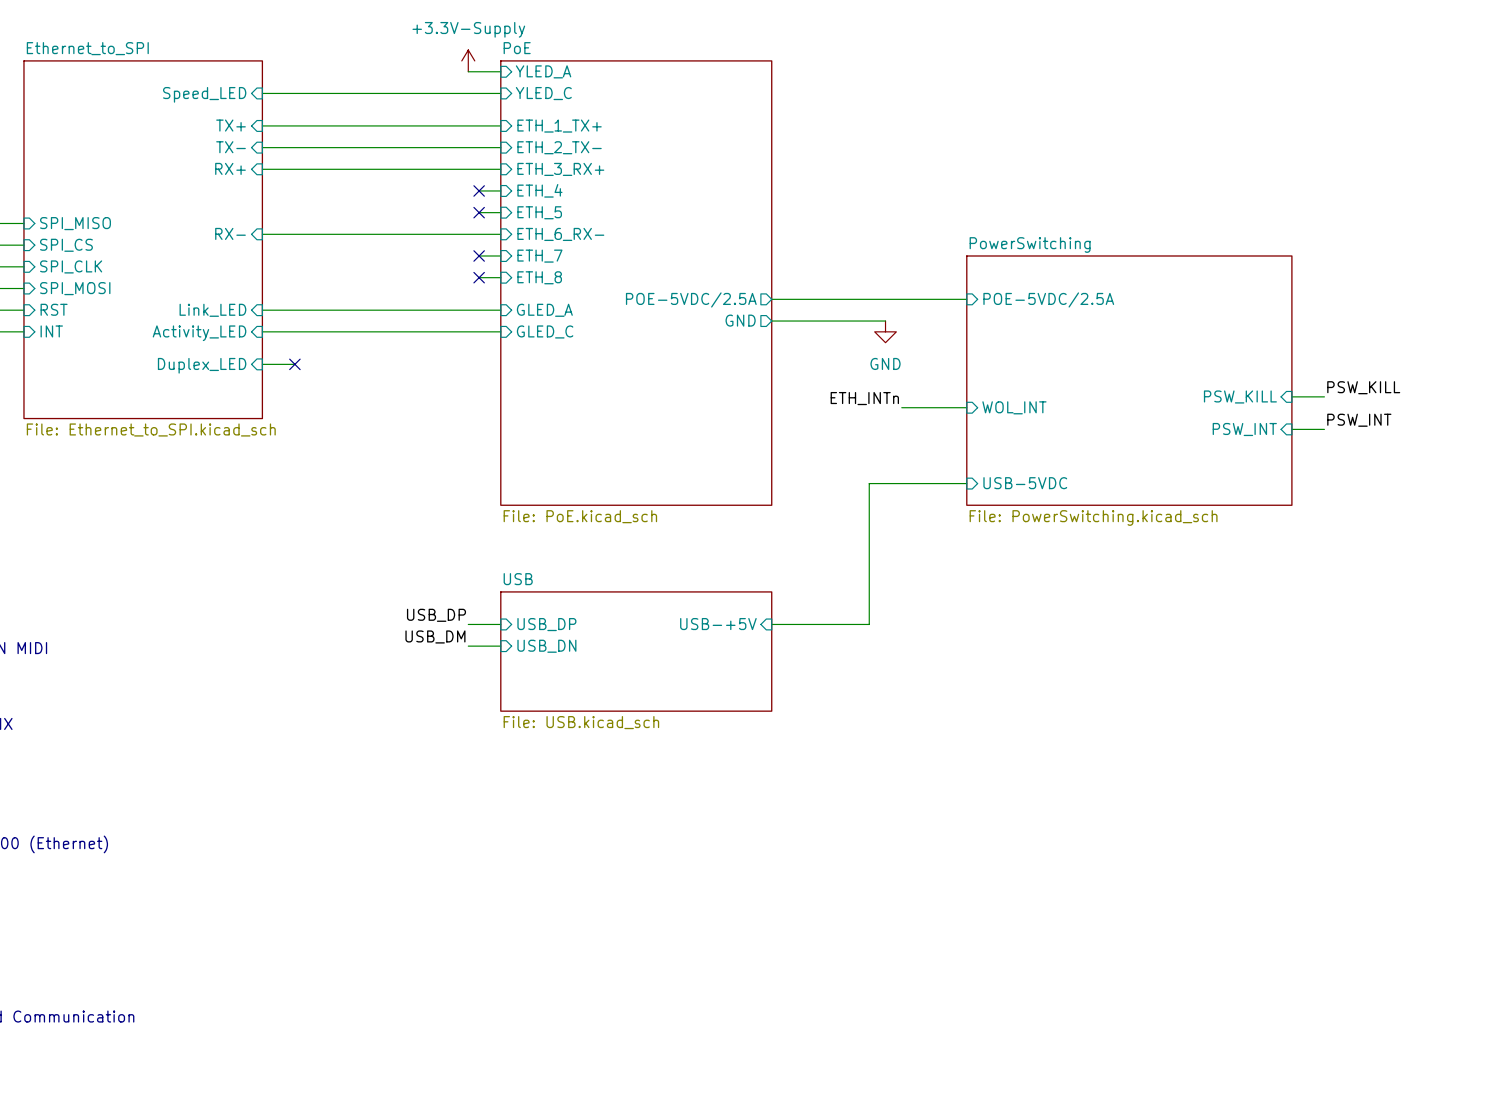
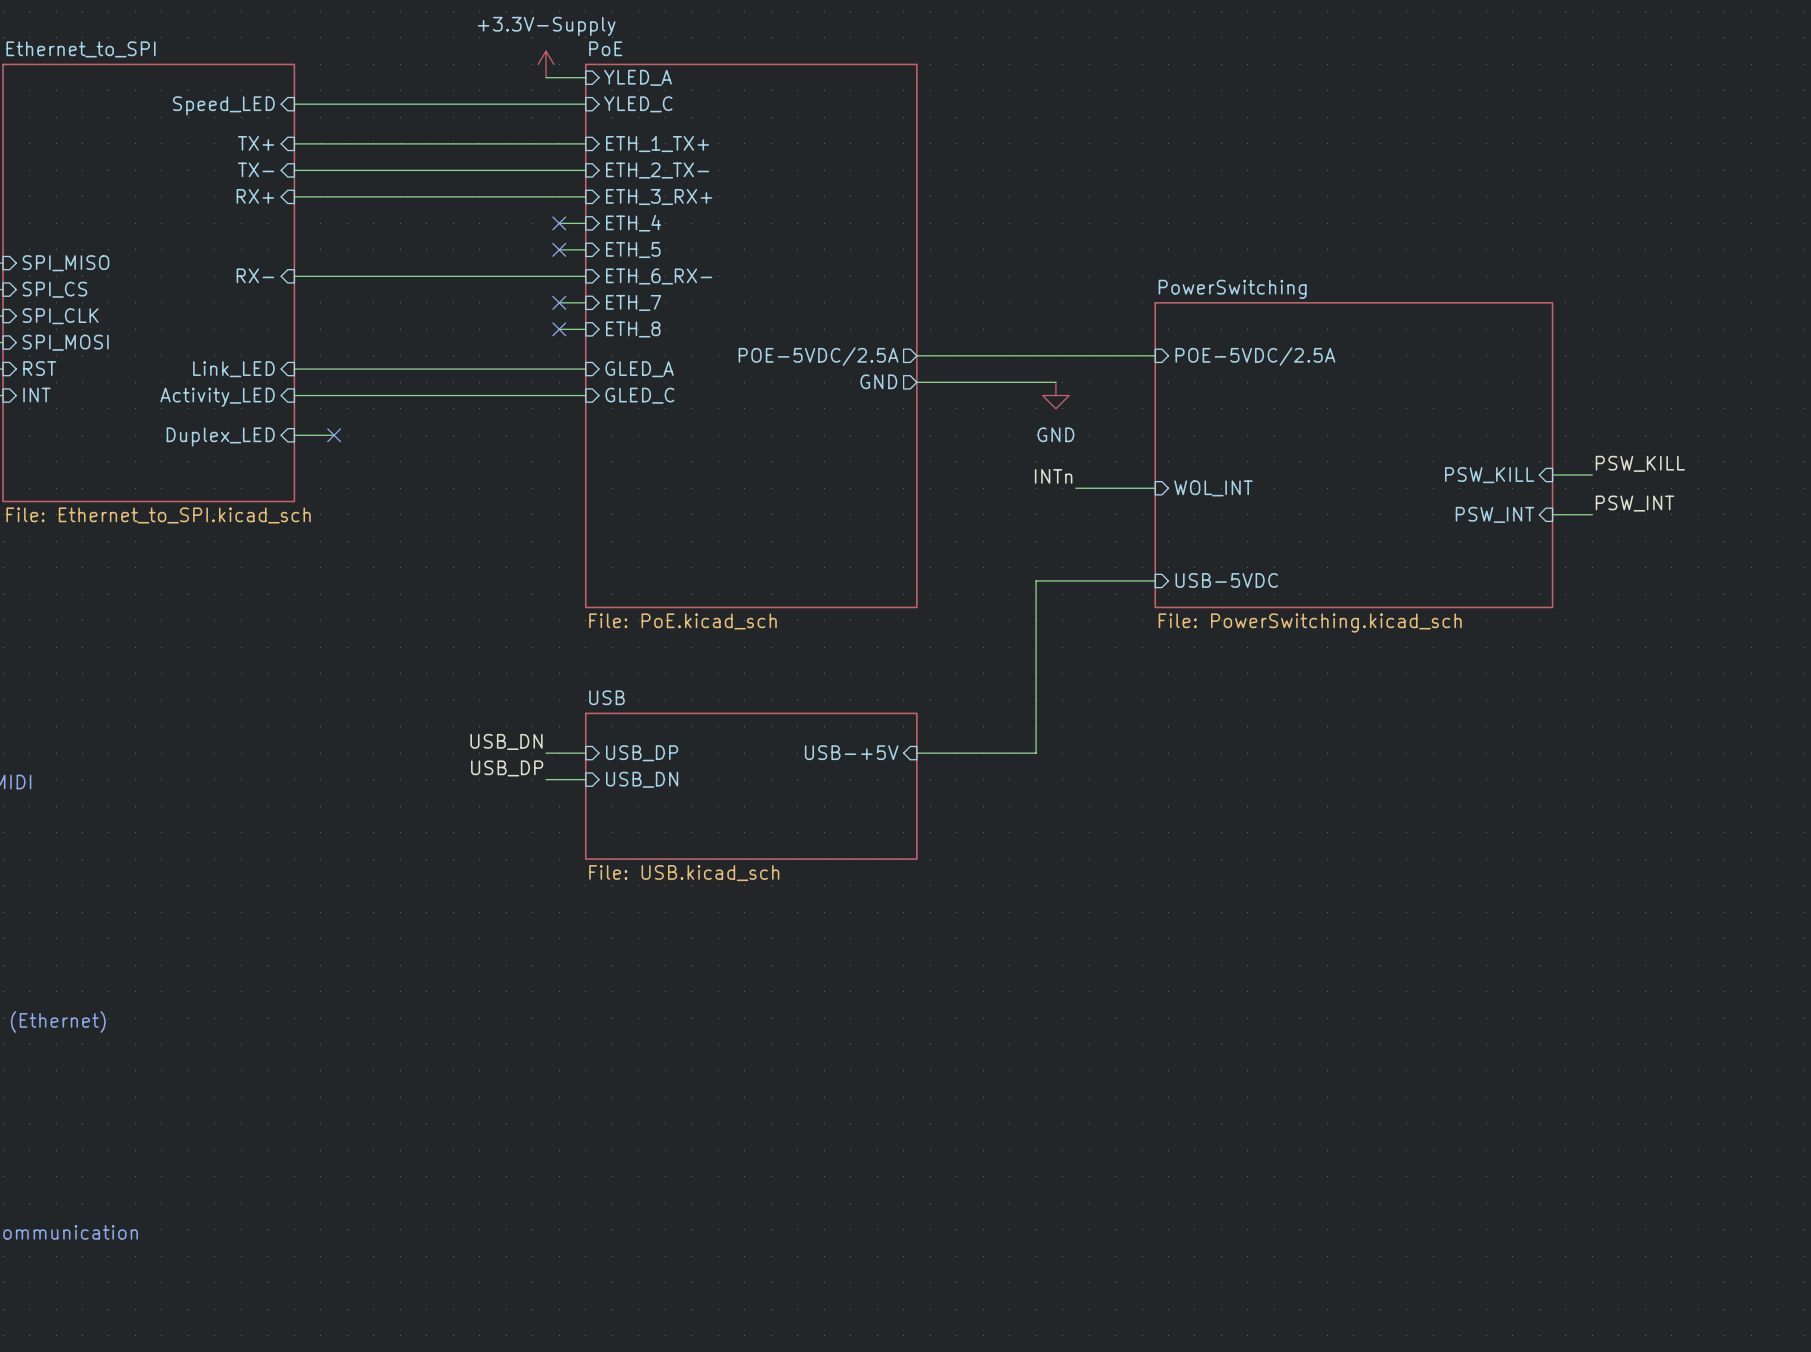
label: ETH_INTn (864, 398) -> INTn (1053, 476)
label: USB_DP (436, 615) -> USB_DN (506, 741)
label: USB_DM (435, 636) -> USB_DP (507, 768)

